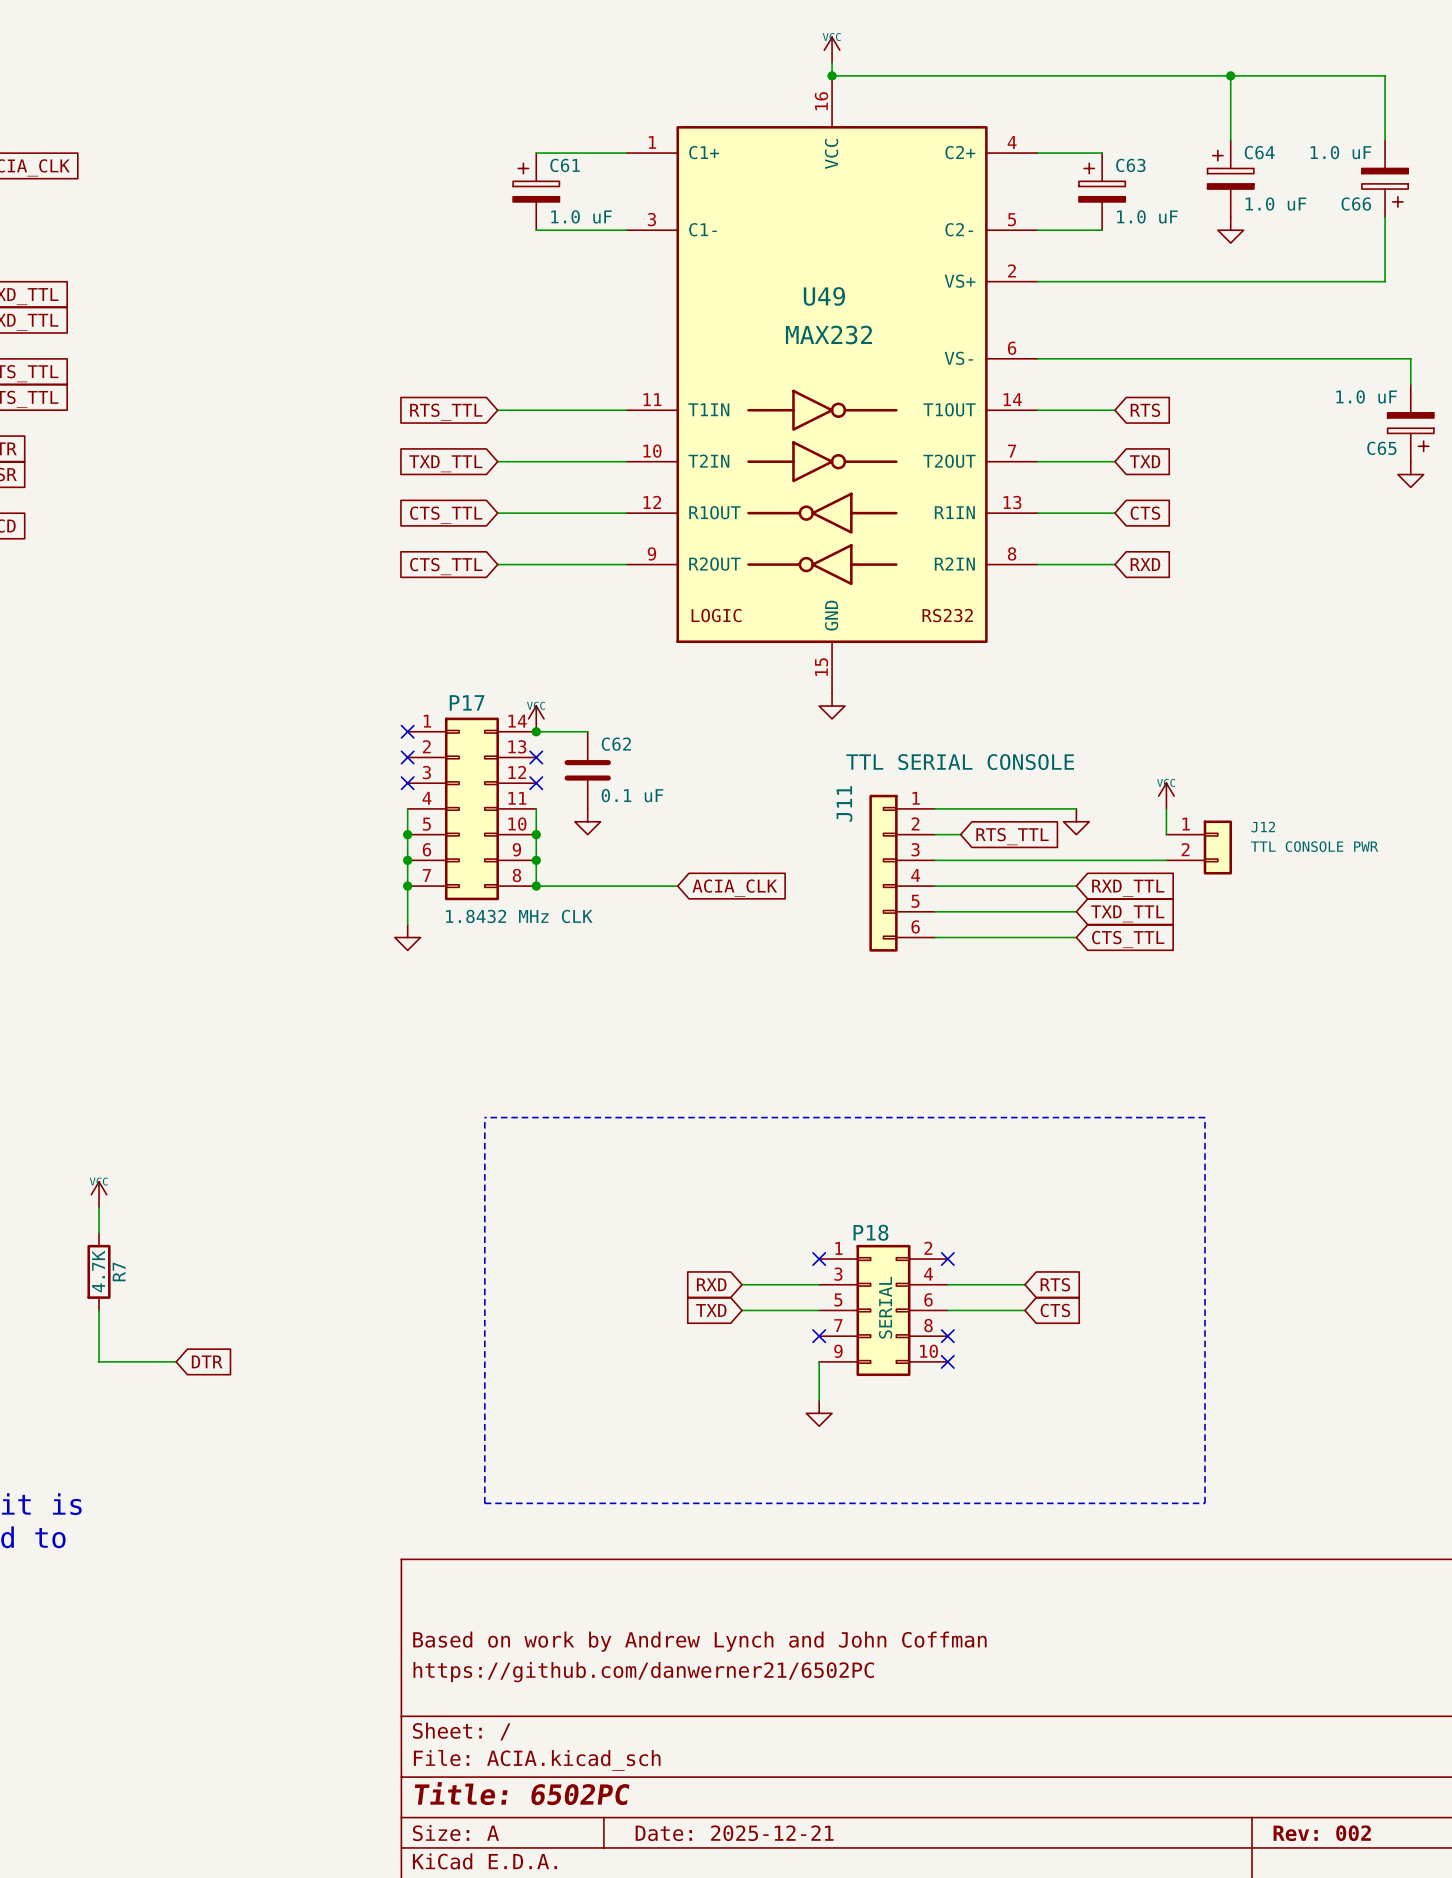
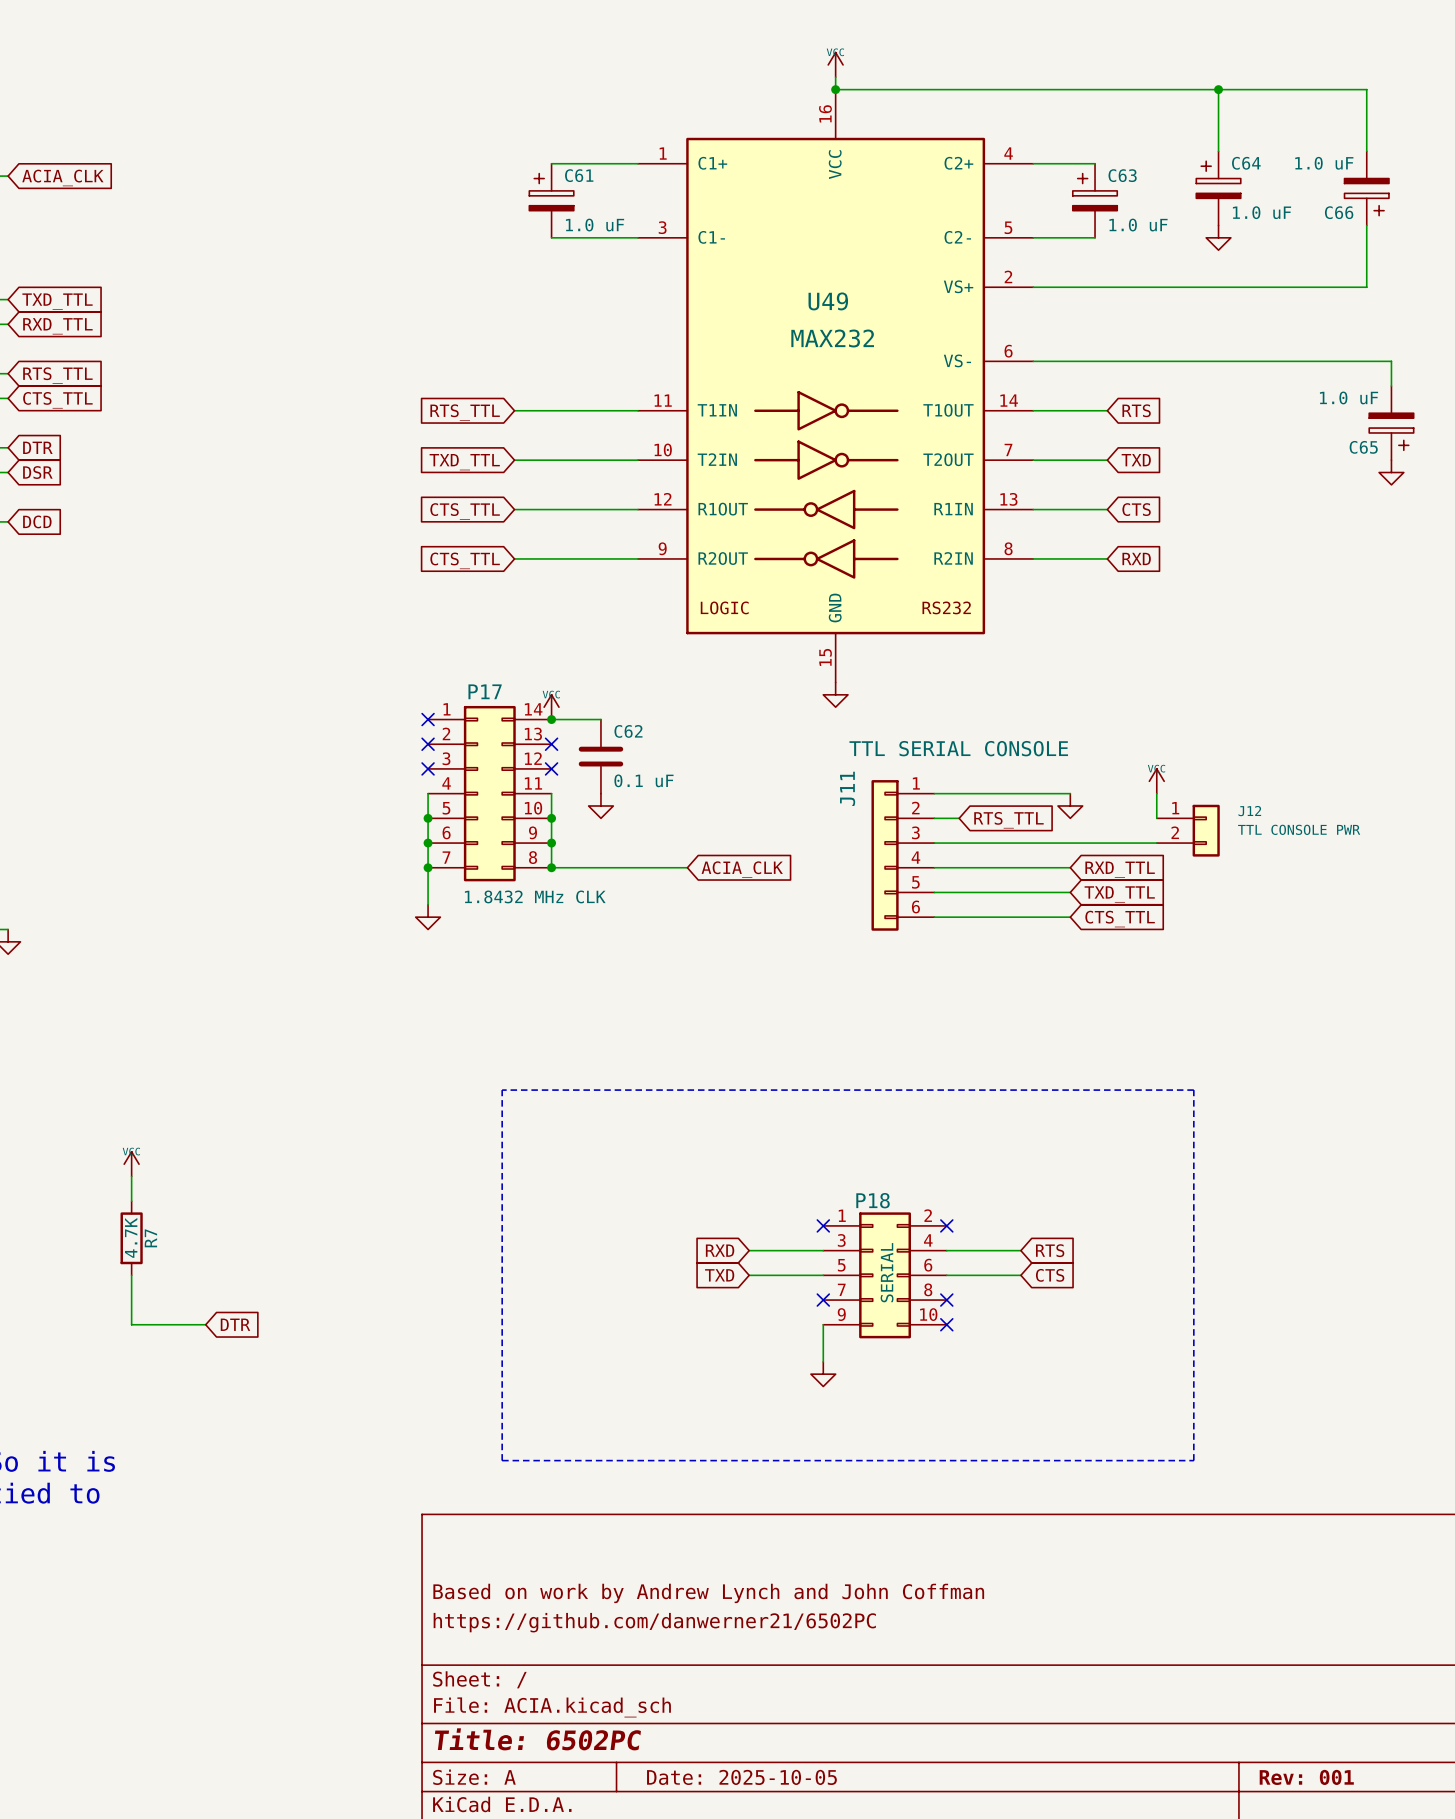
title block: Date: 2025-12-21 (734, 1833) -> Date: 2025-10-05 (741, 1777)
title block: Rev: 002 (1322, 1833) -> Rev: 001 (1306, 1777)

